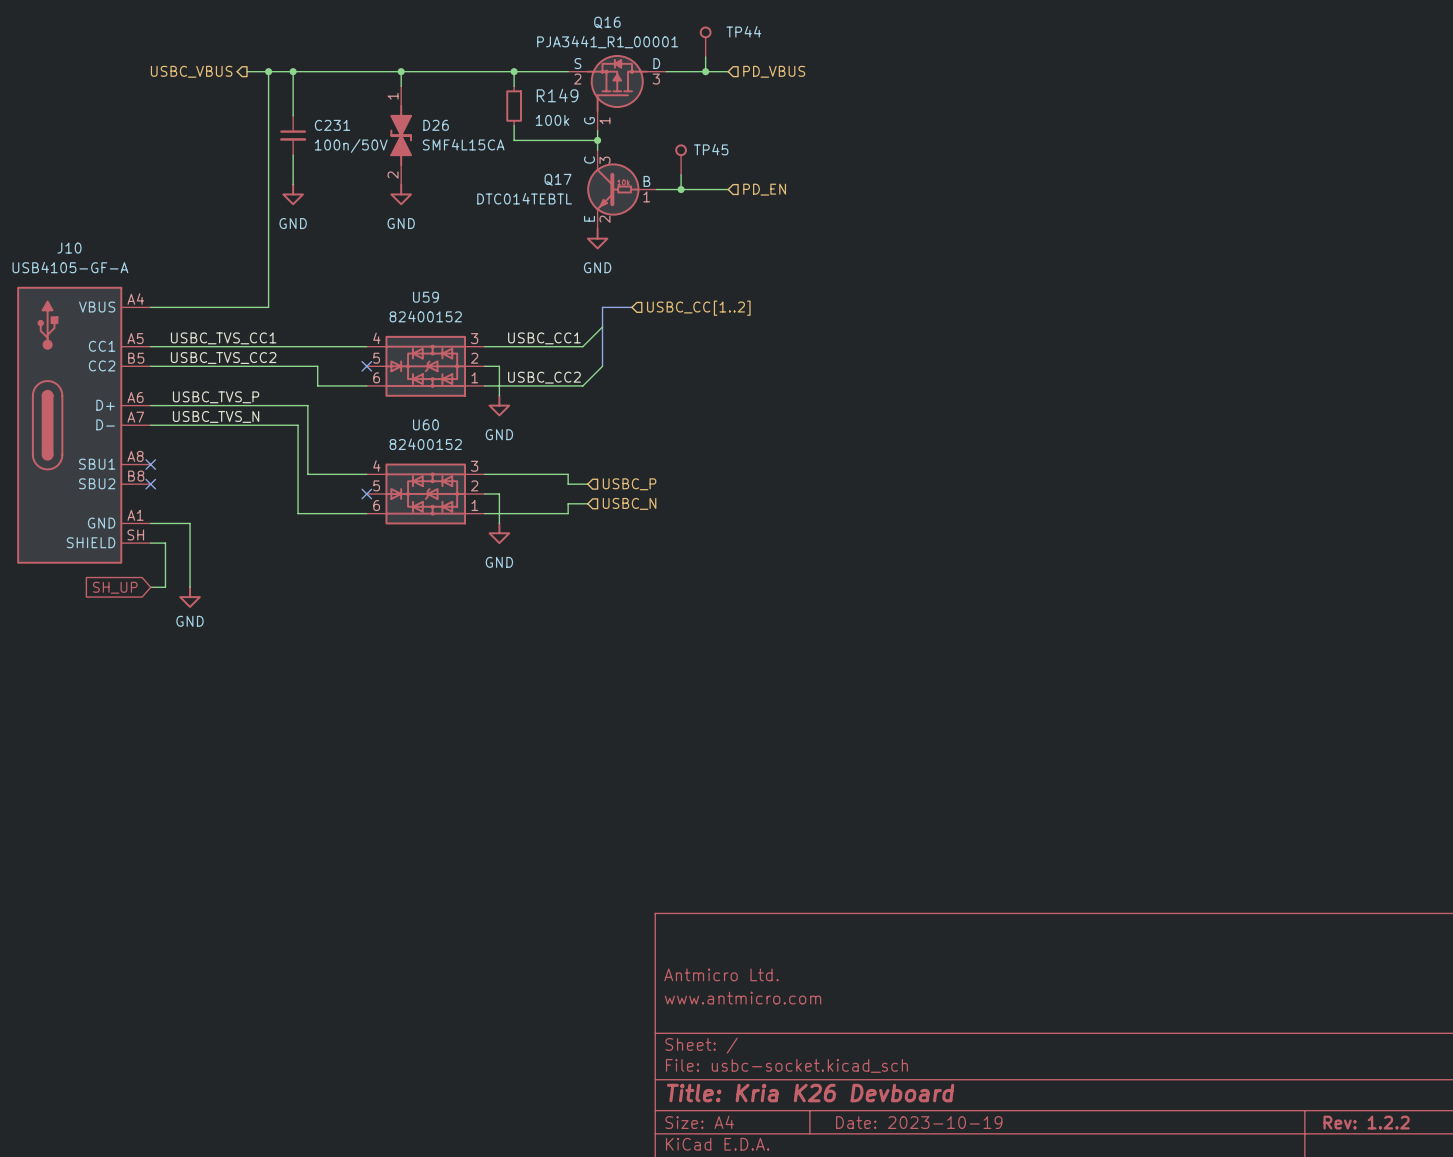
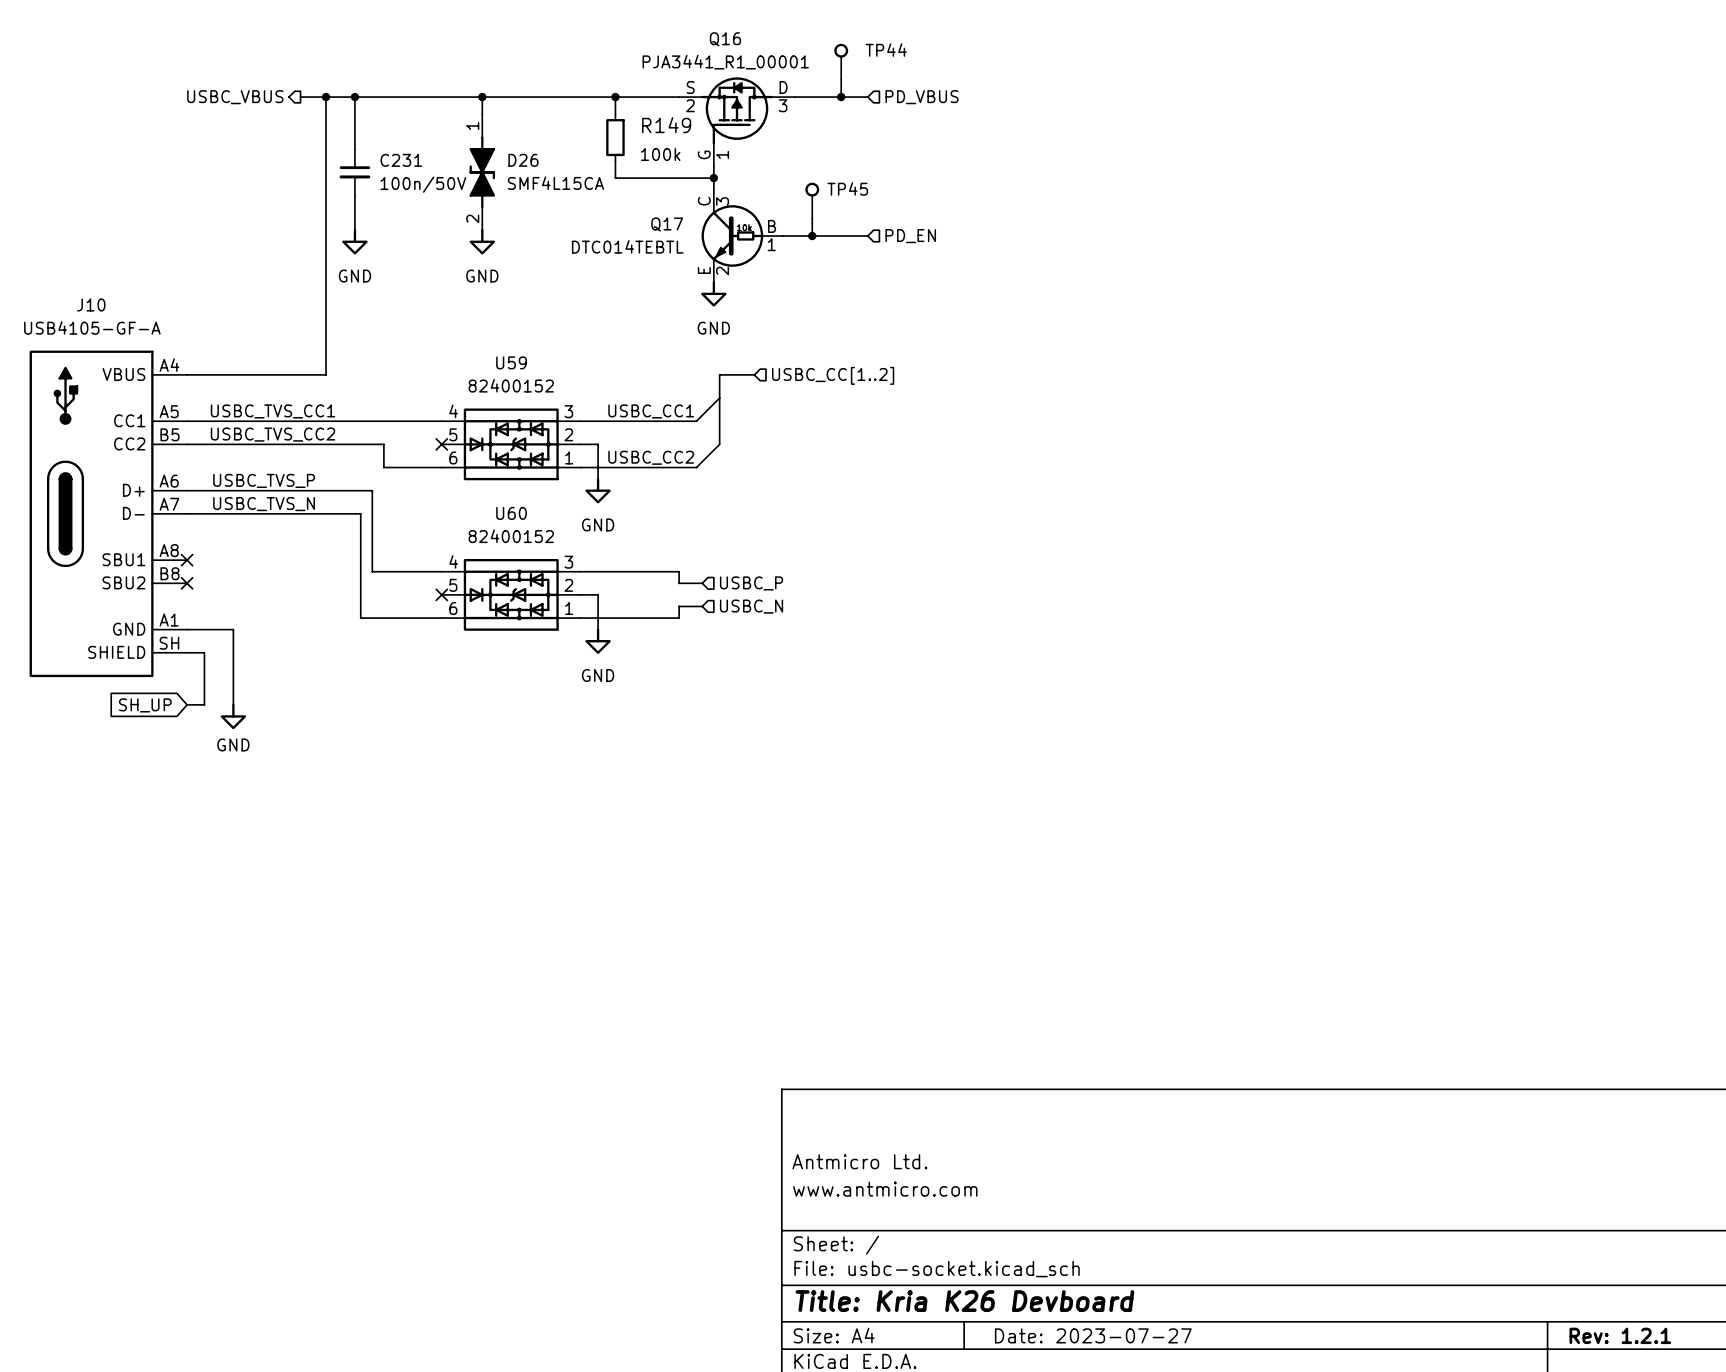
title block: Date: 2023-10-19 (919, 1122) -> Date: 2023-07-27 (1093, 1335)
title block: Rev: 1.2.2 (1366, 1122) -> Rev: 1.2.1 (1620, 1335)

